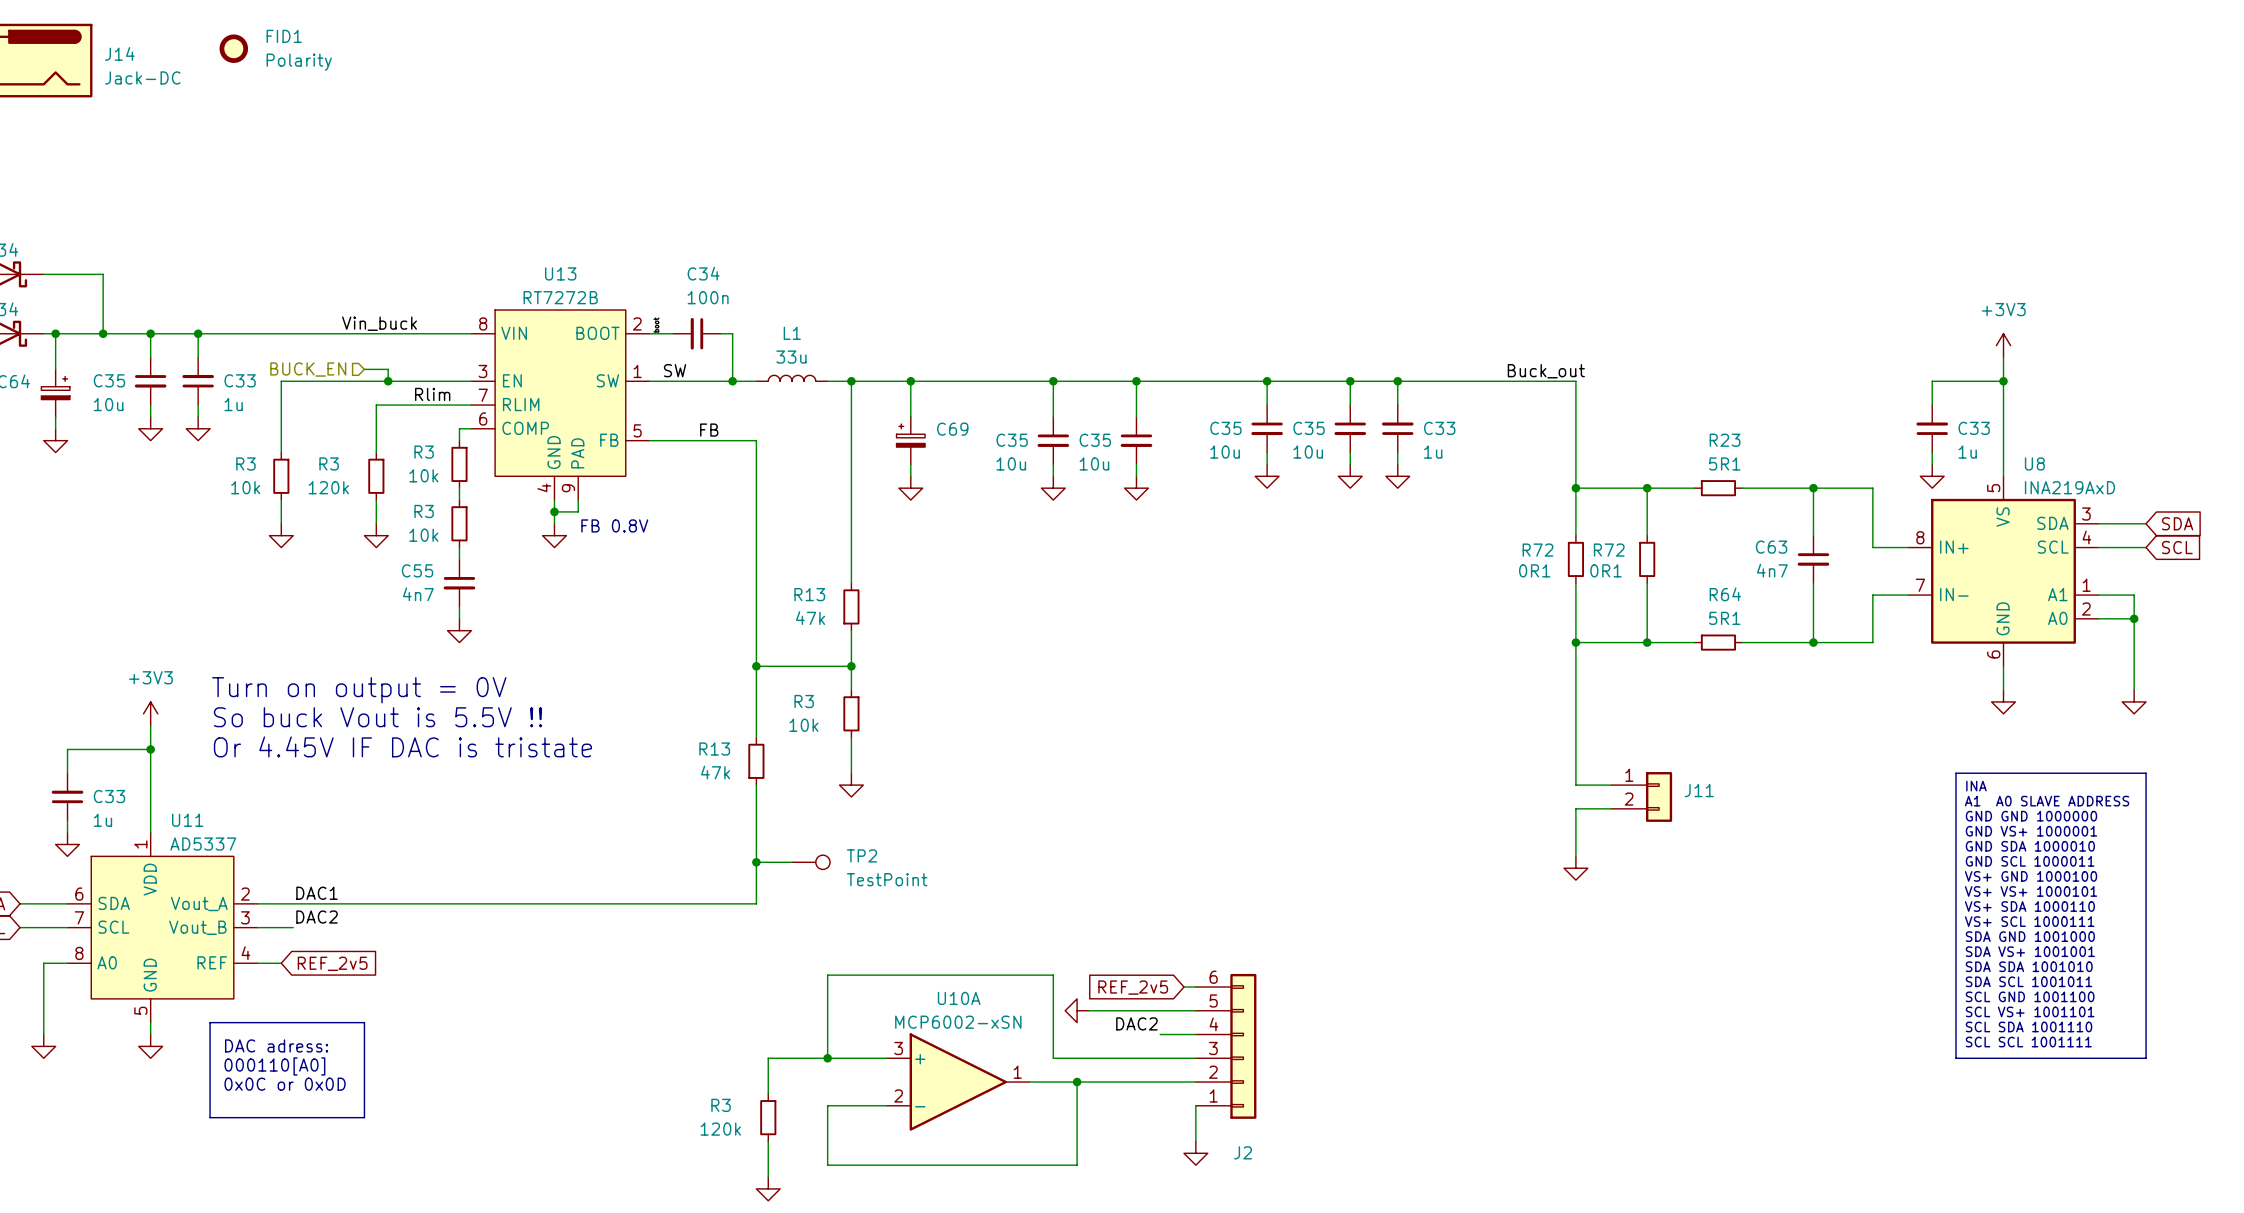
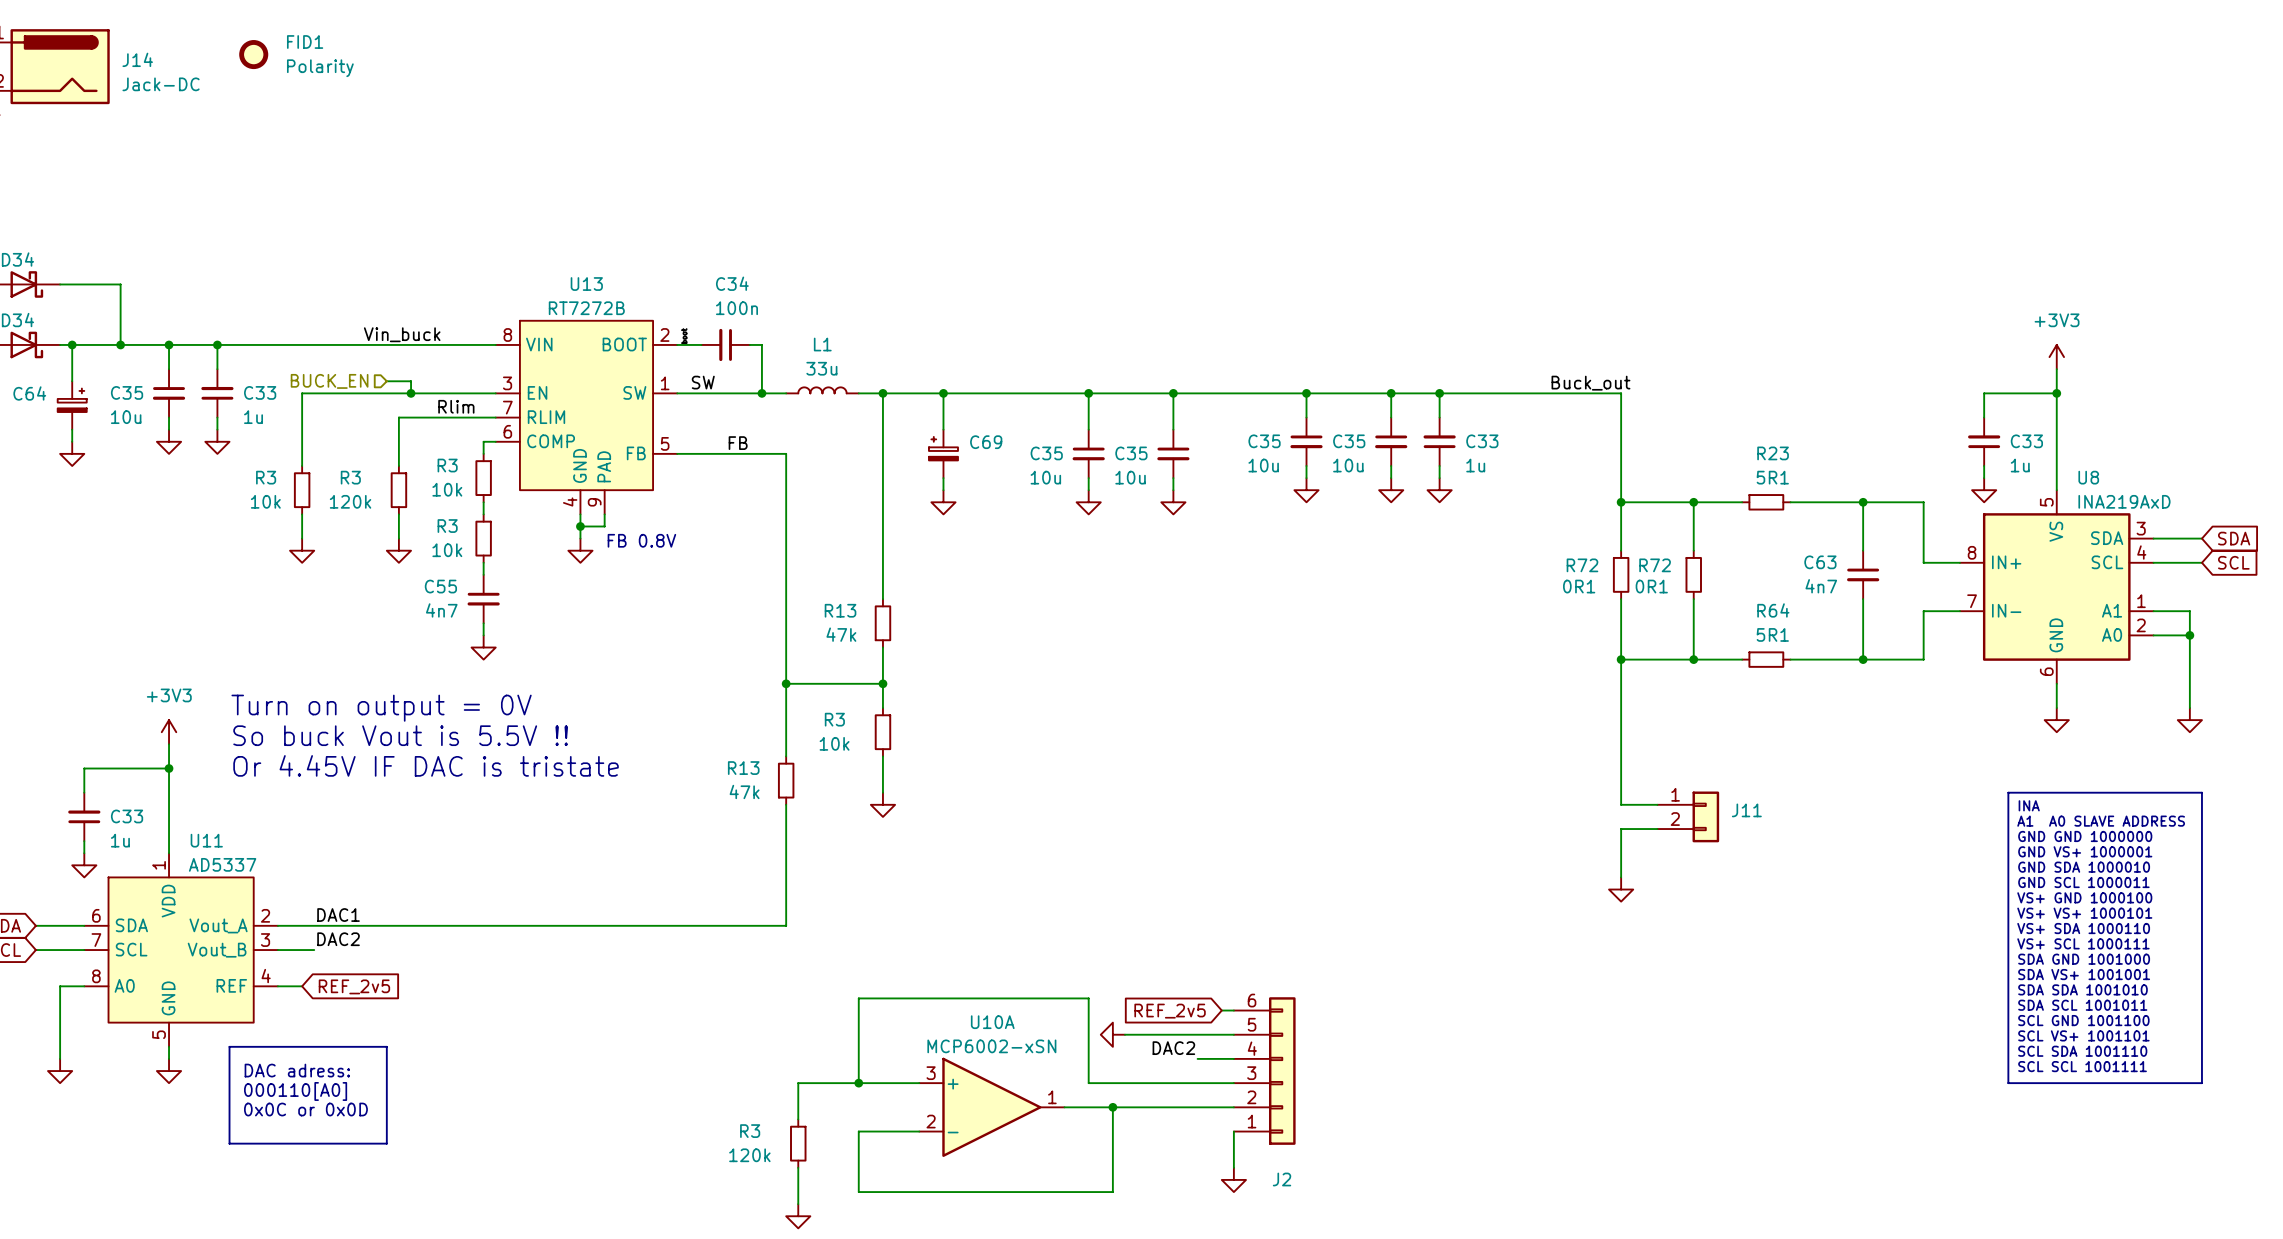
wire: (756, 862) (792, 862) -> none
junction: (756, 862) -> none
TP2: TestPoint (811, 862) -> none

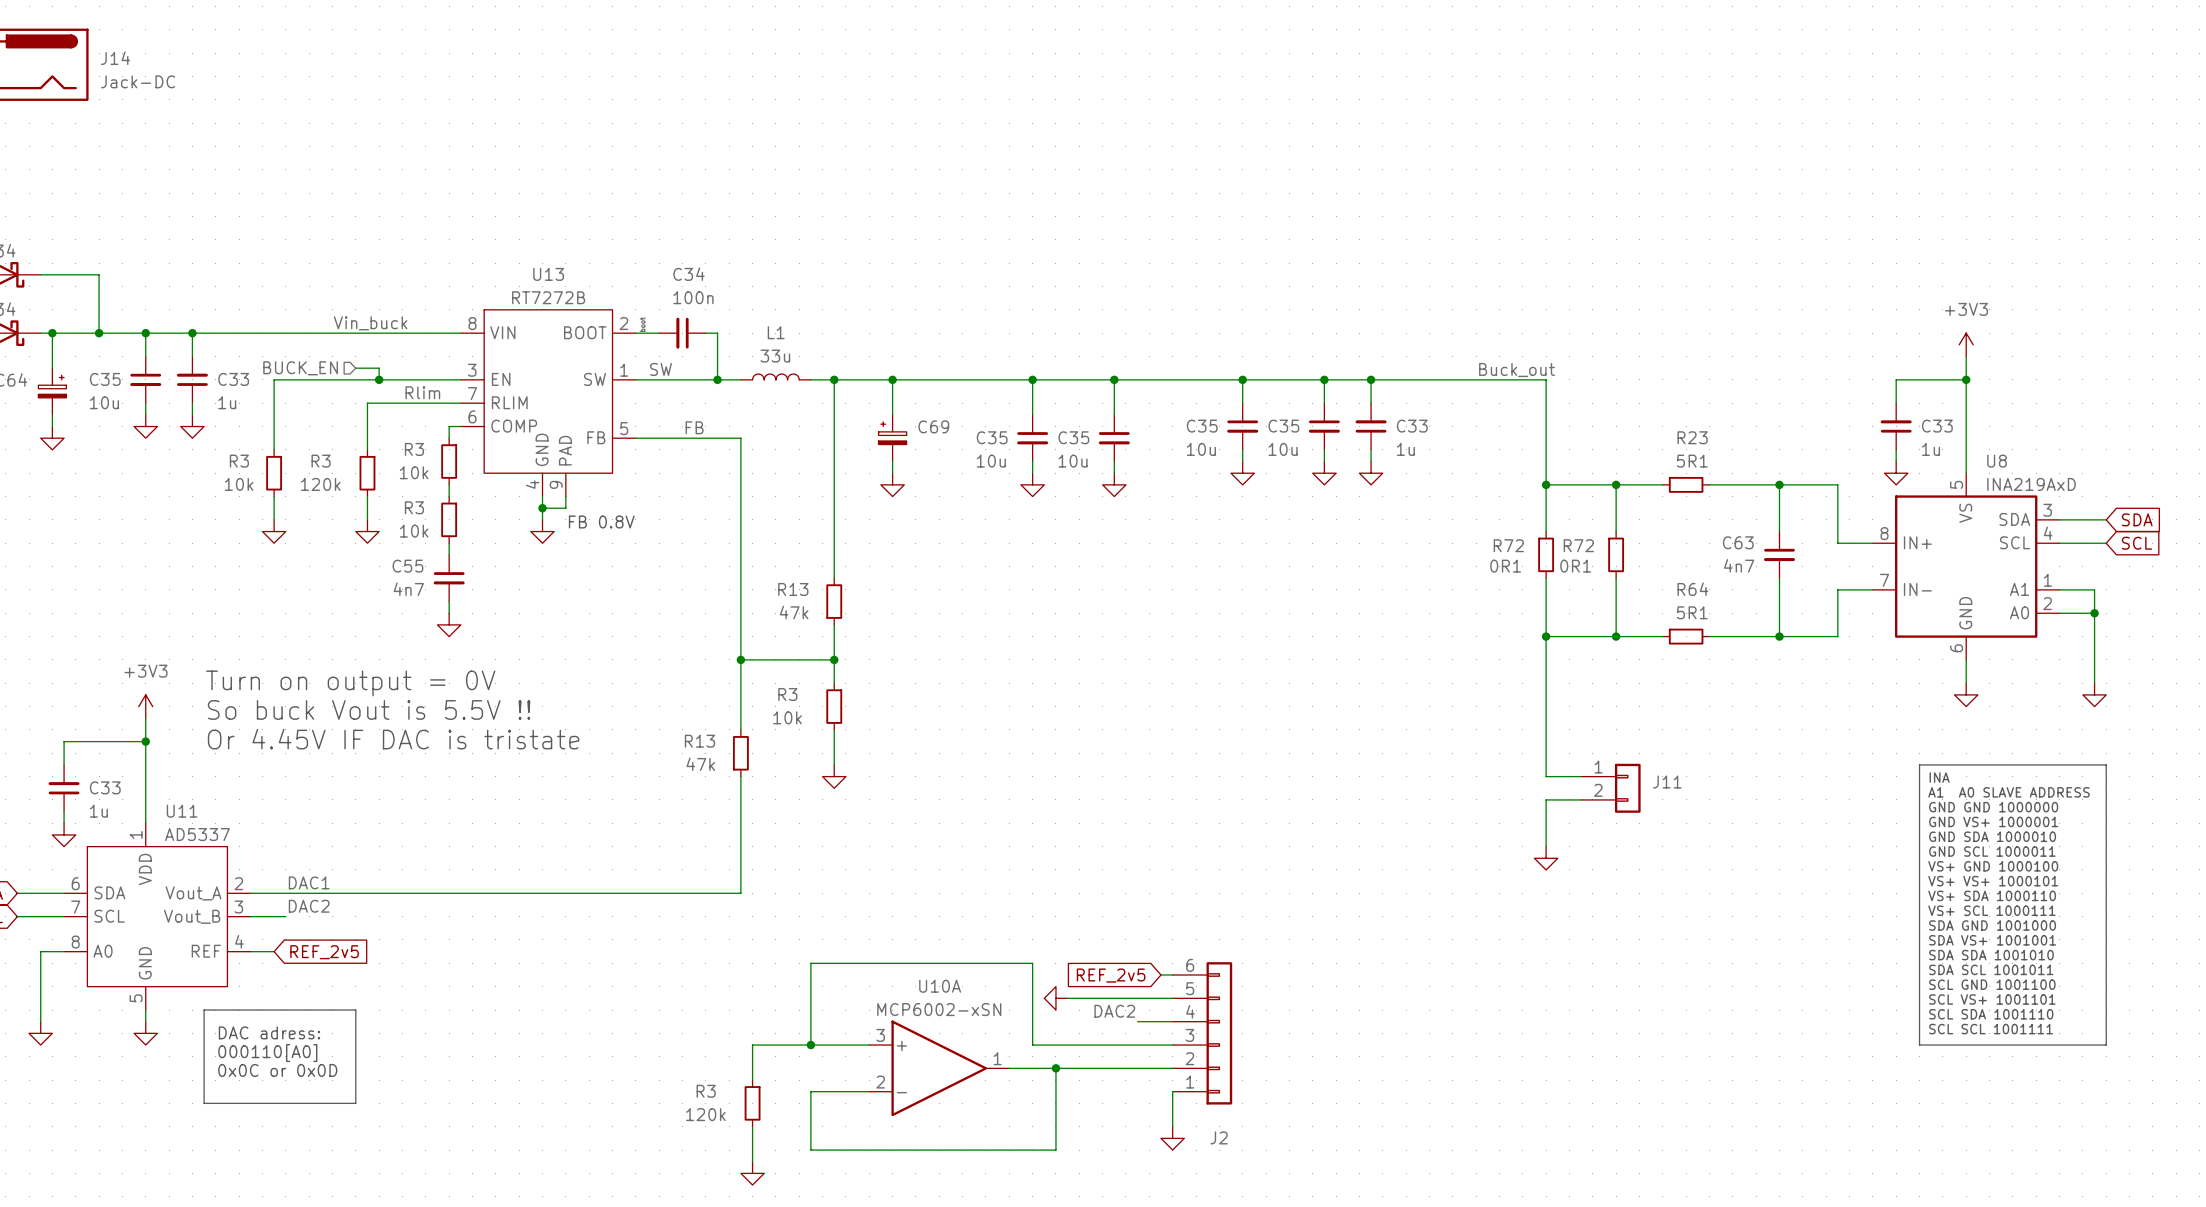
FID1: Polarity (253, 54) -> none

